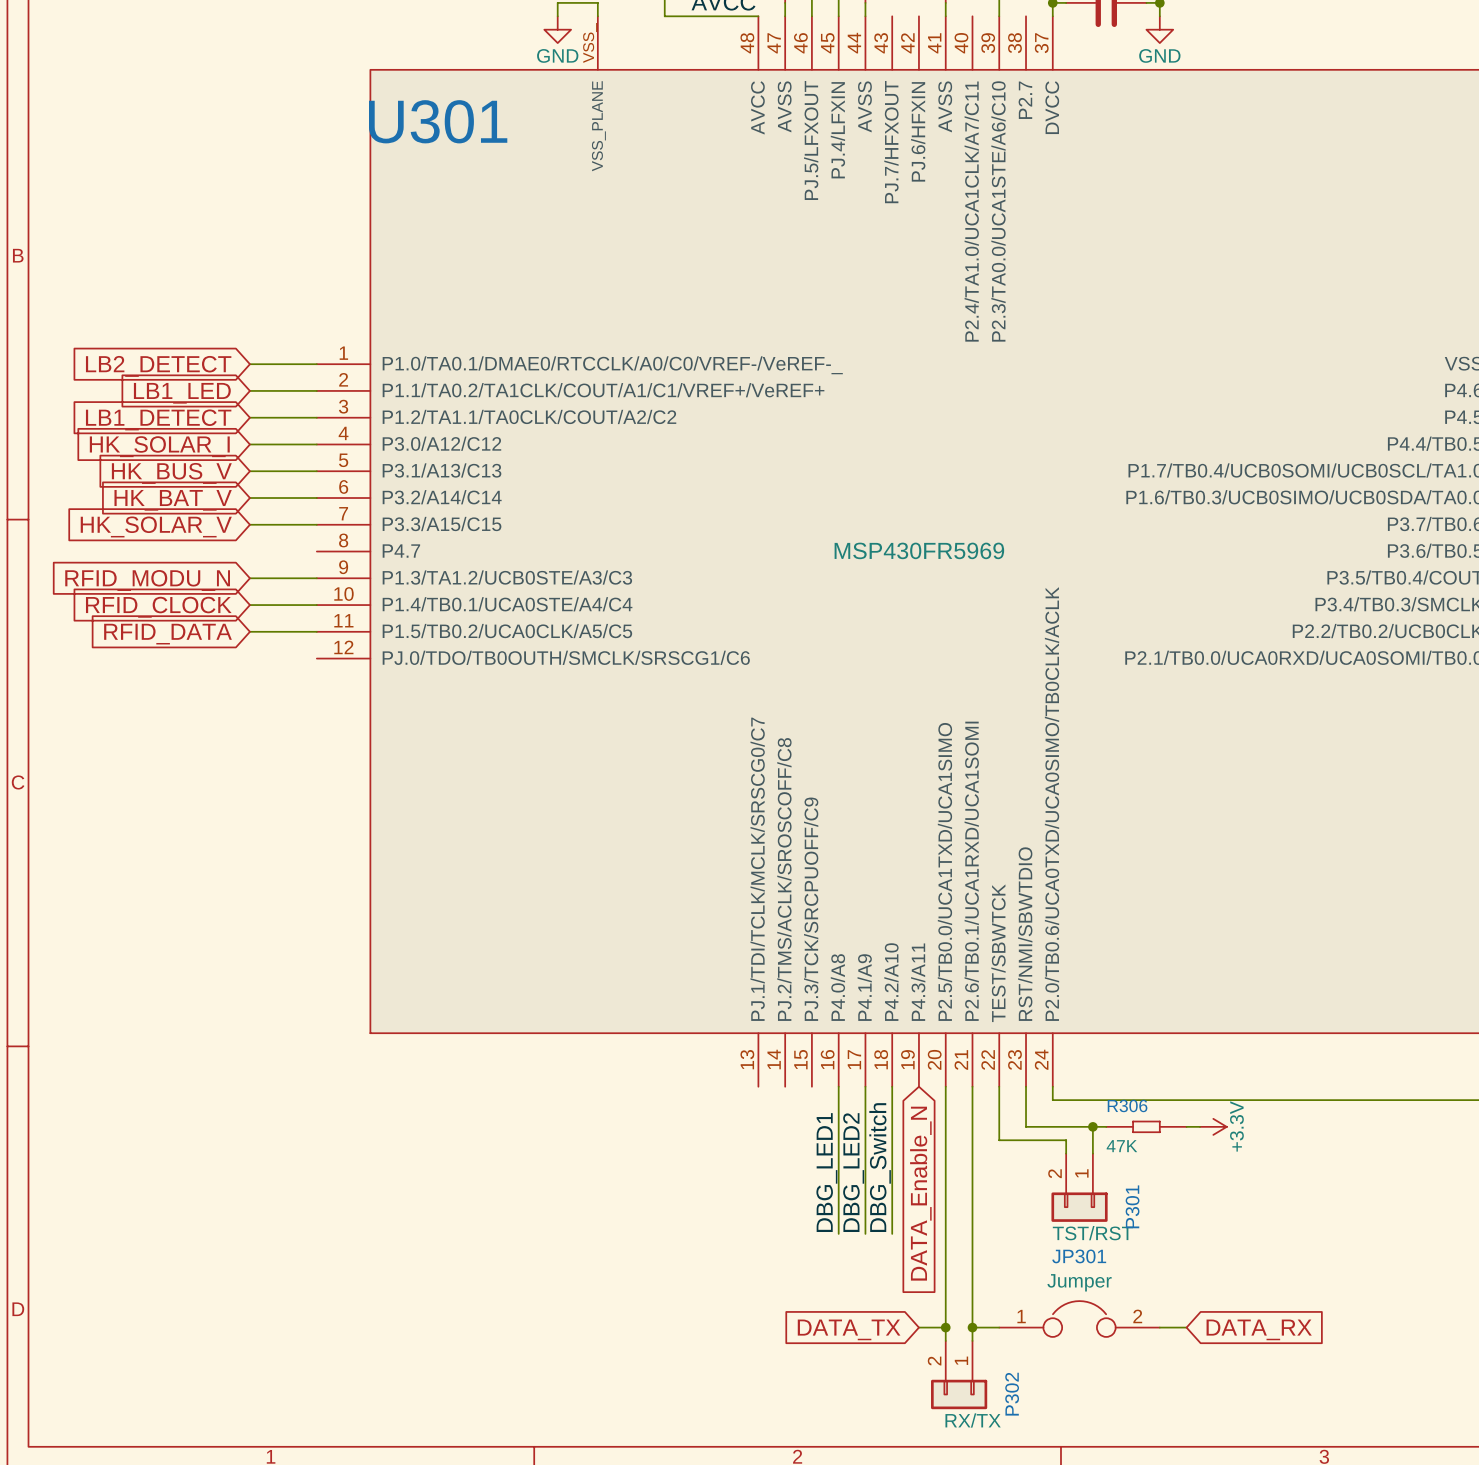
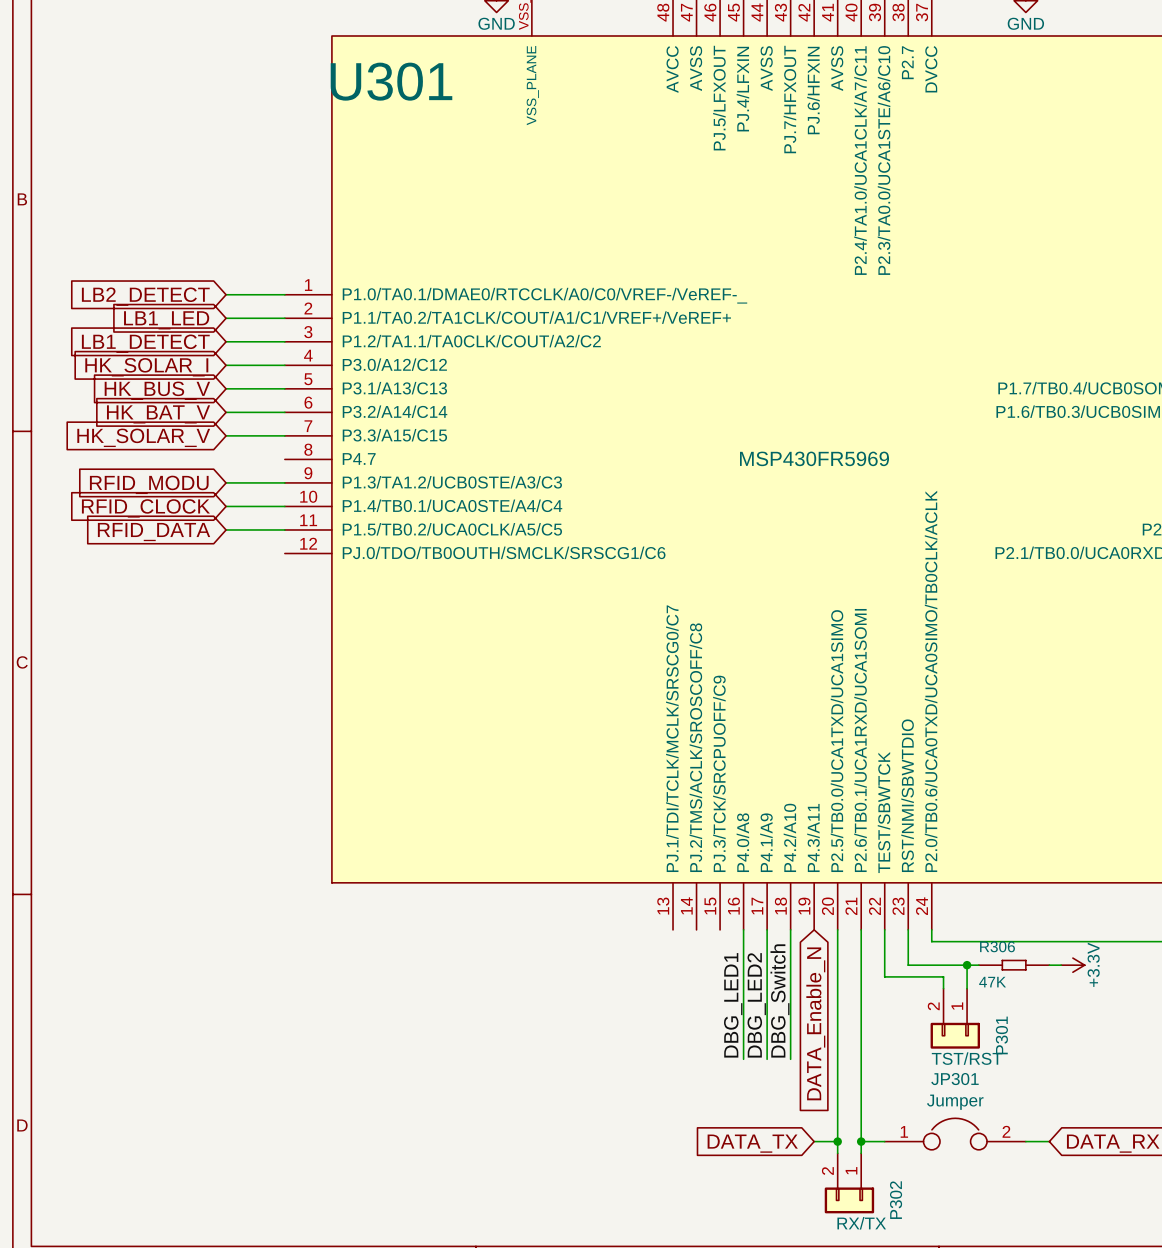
global label: RFID_MODU_N (147, 580) -> RFID_MODU (149, 484)

